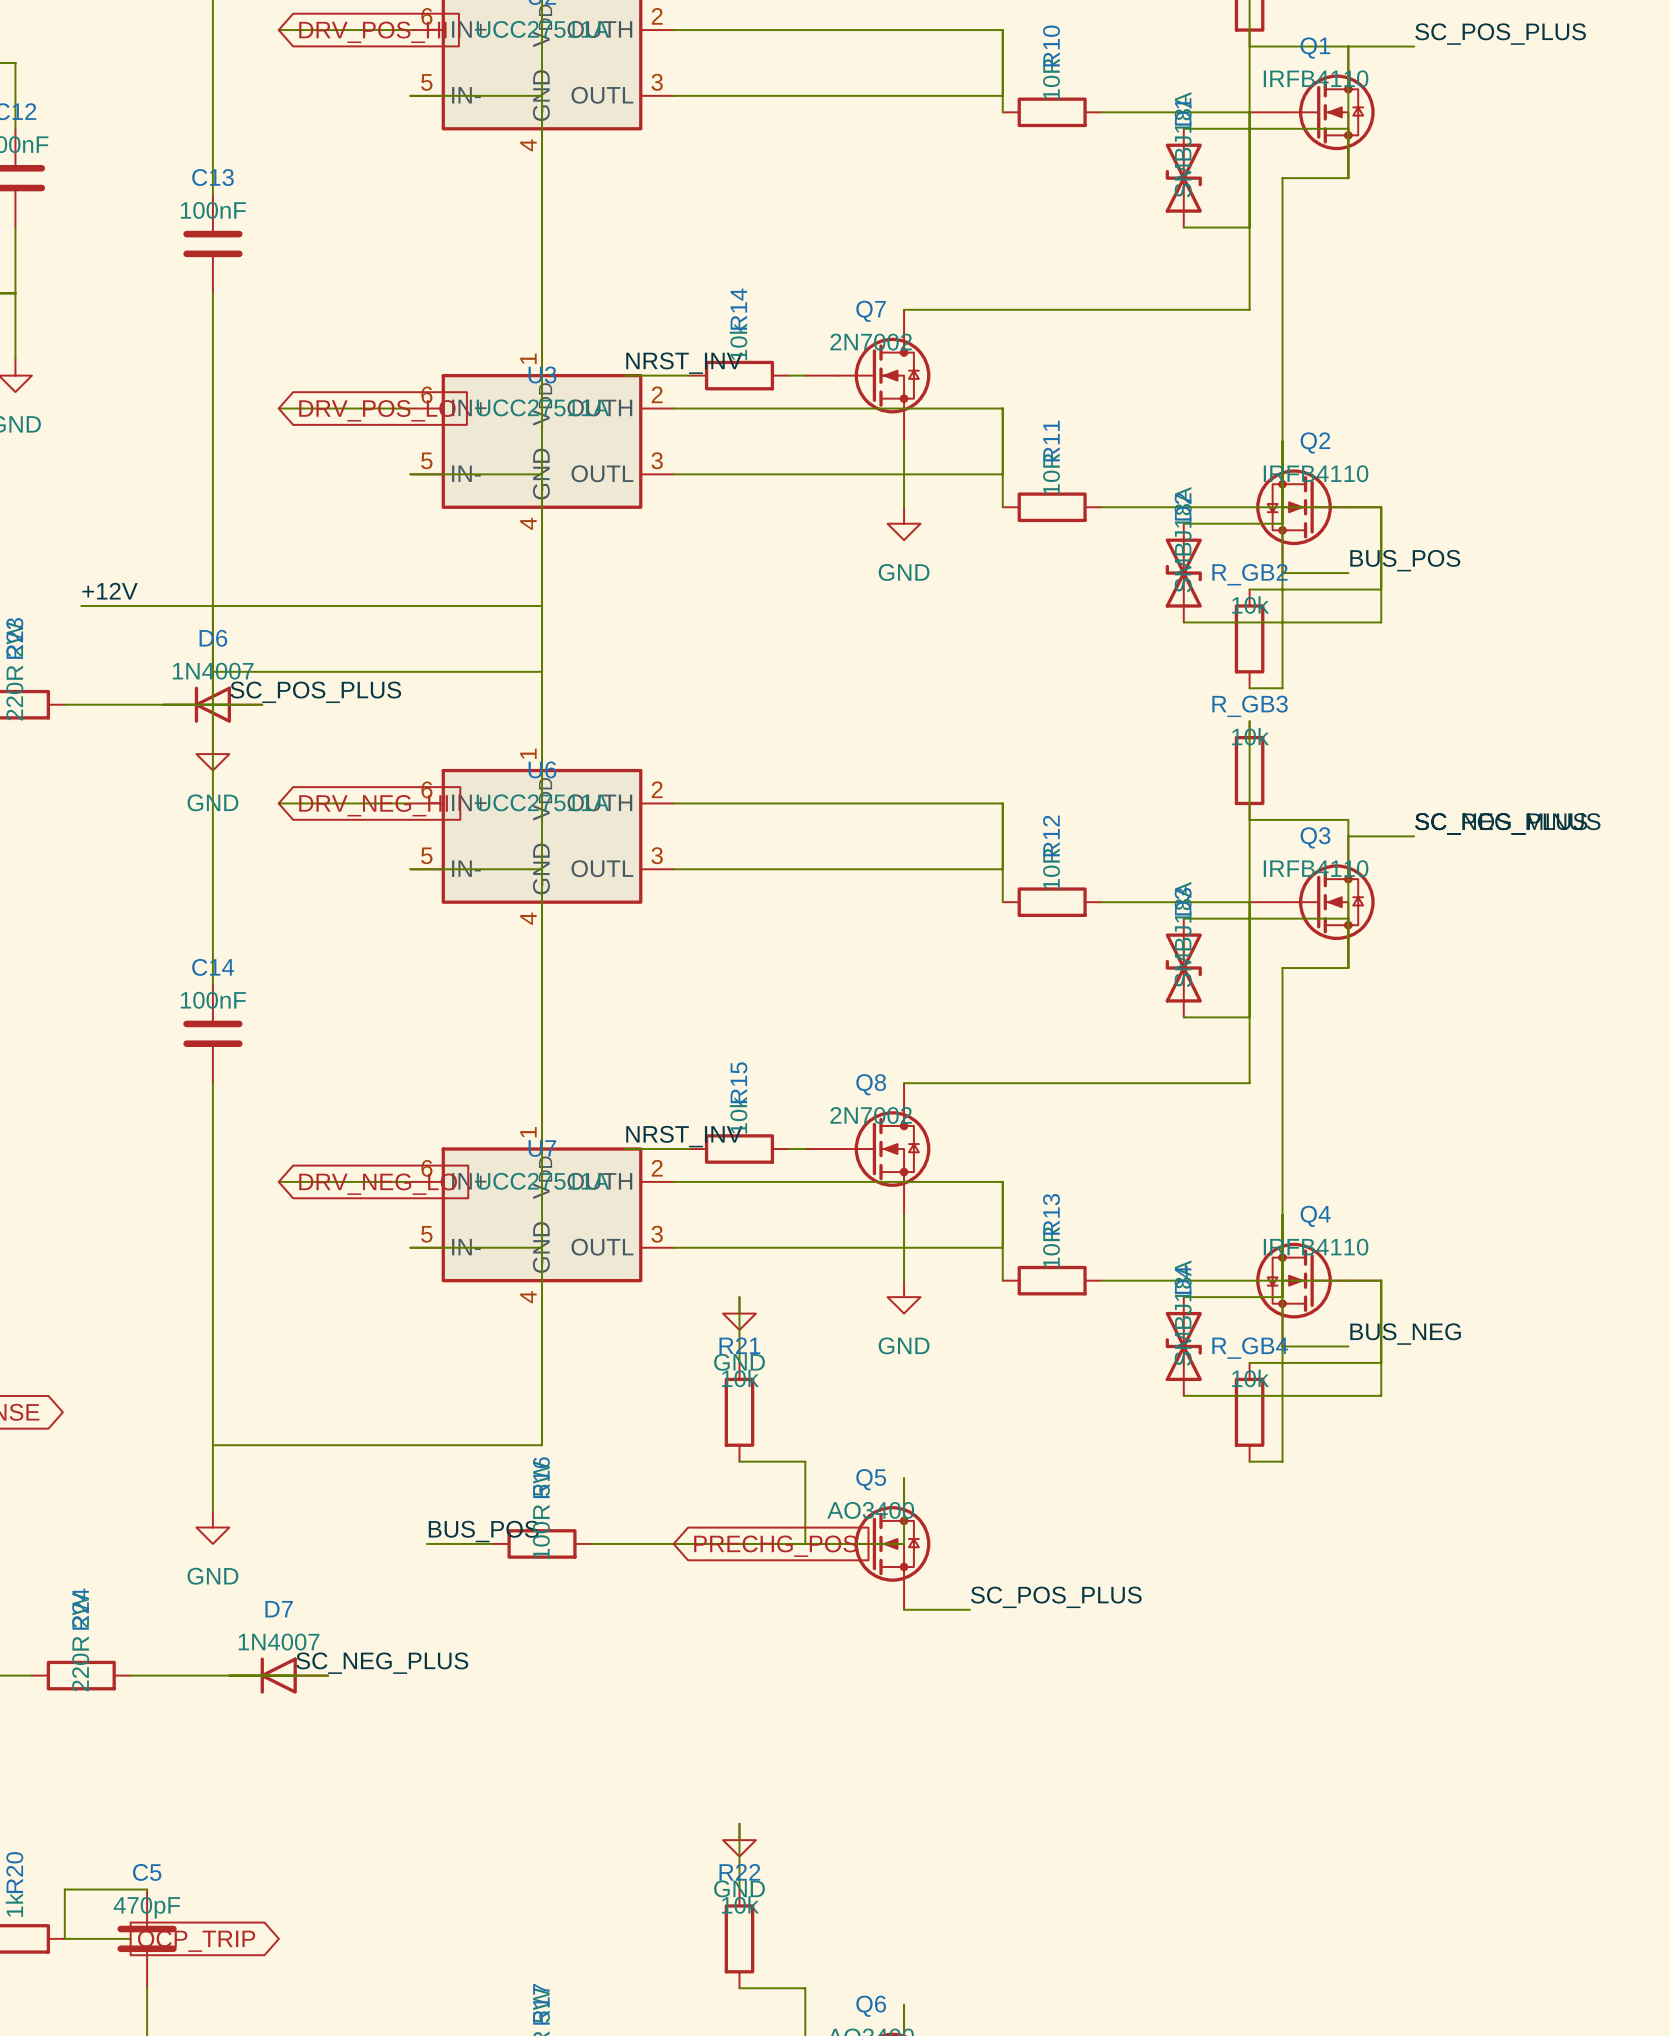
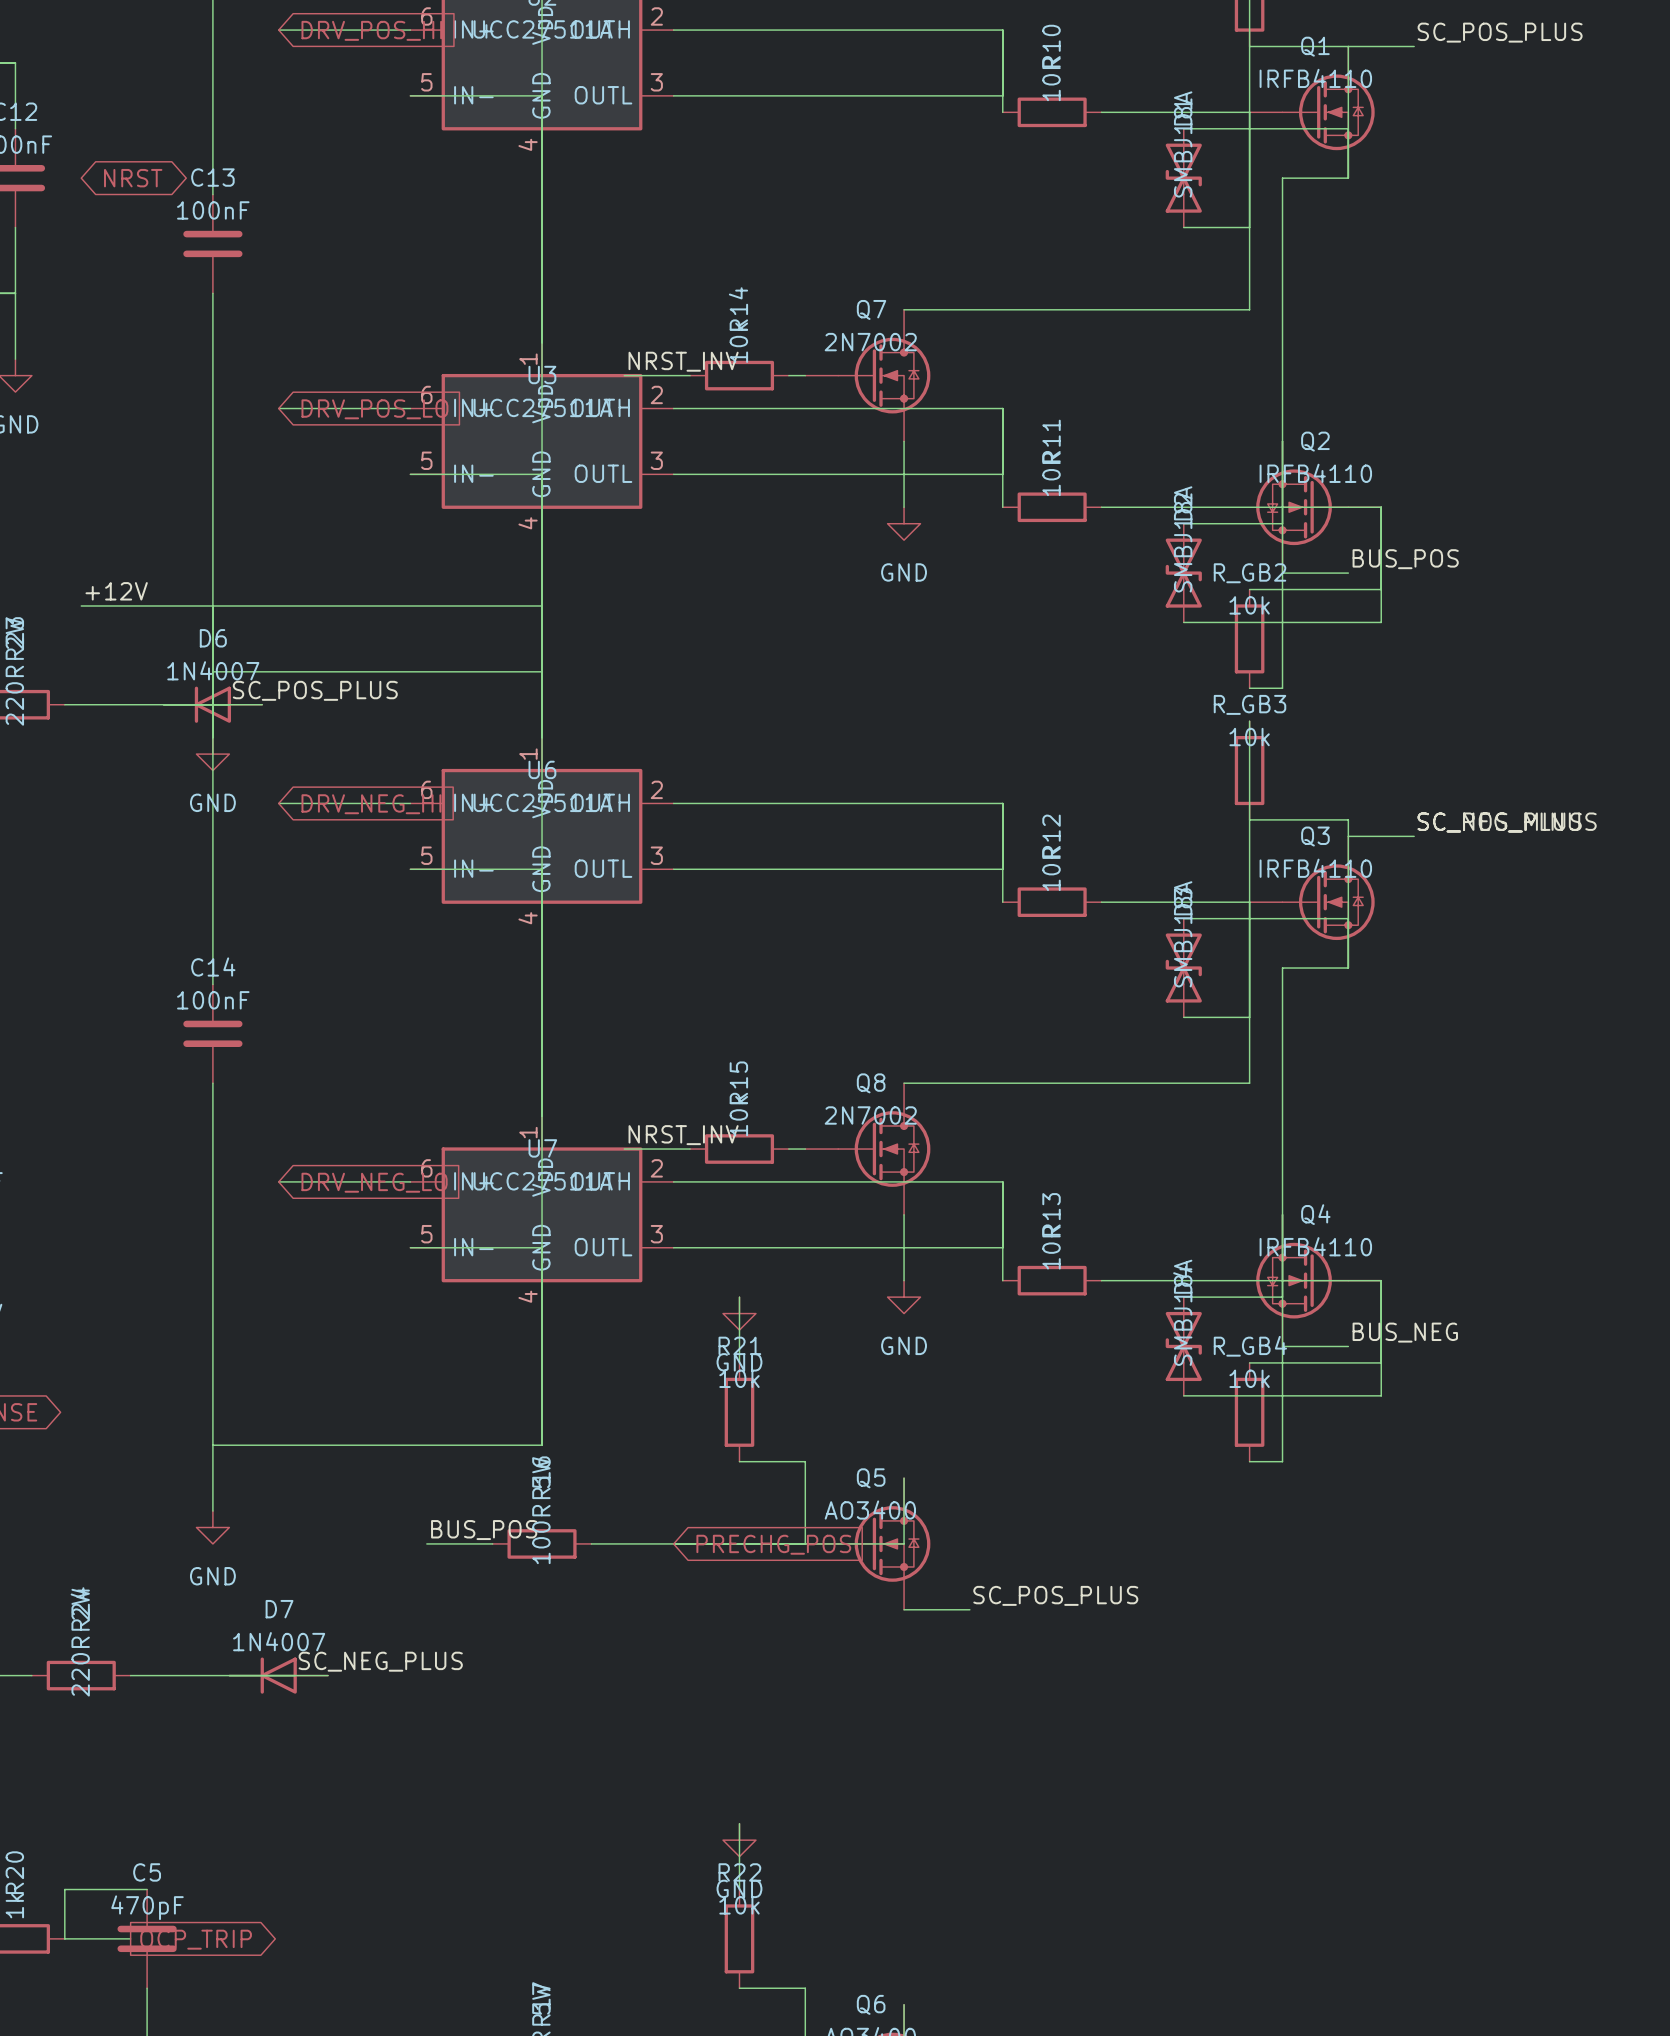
global label: none -> NRST (133, 178)

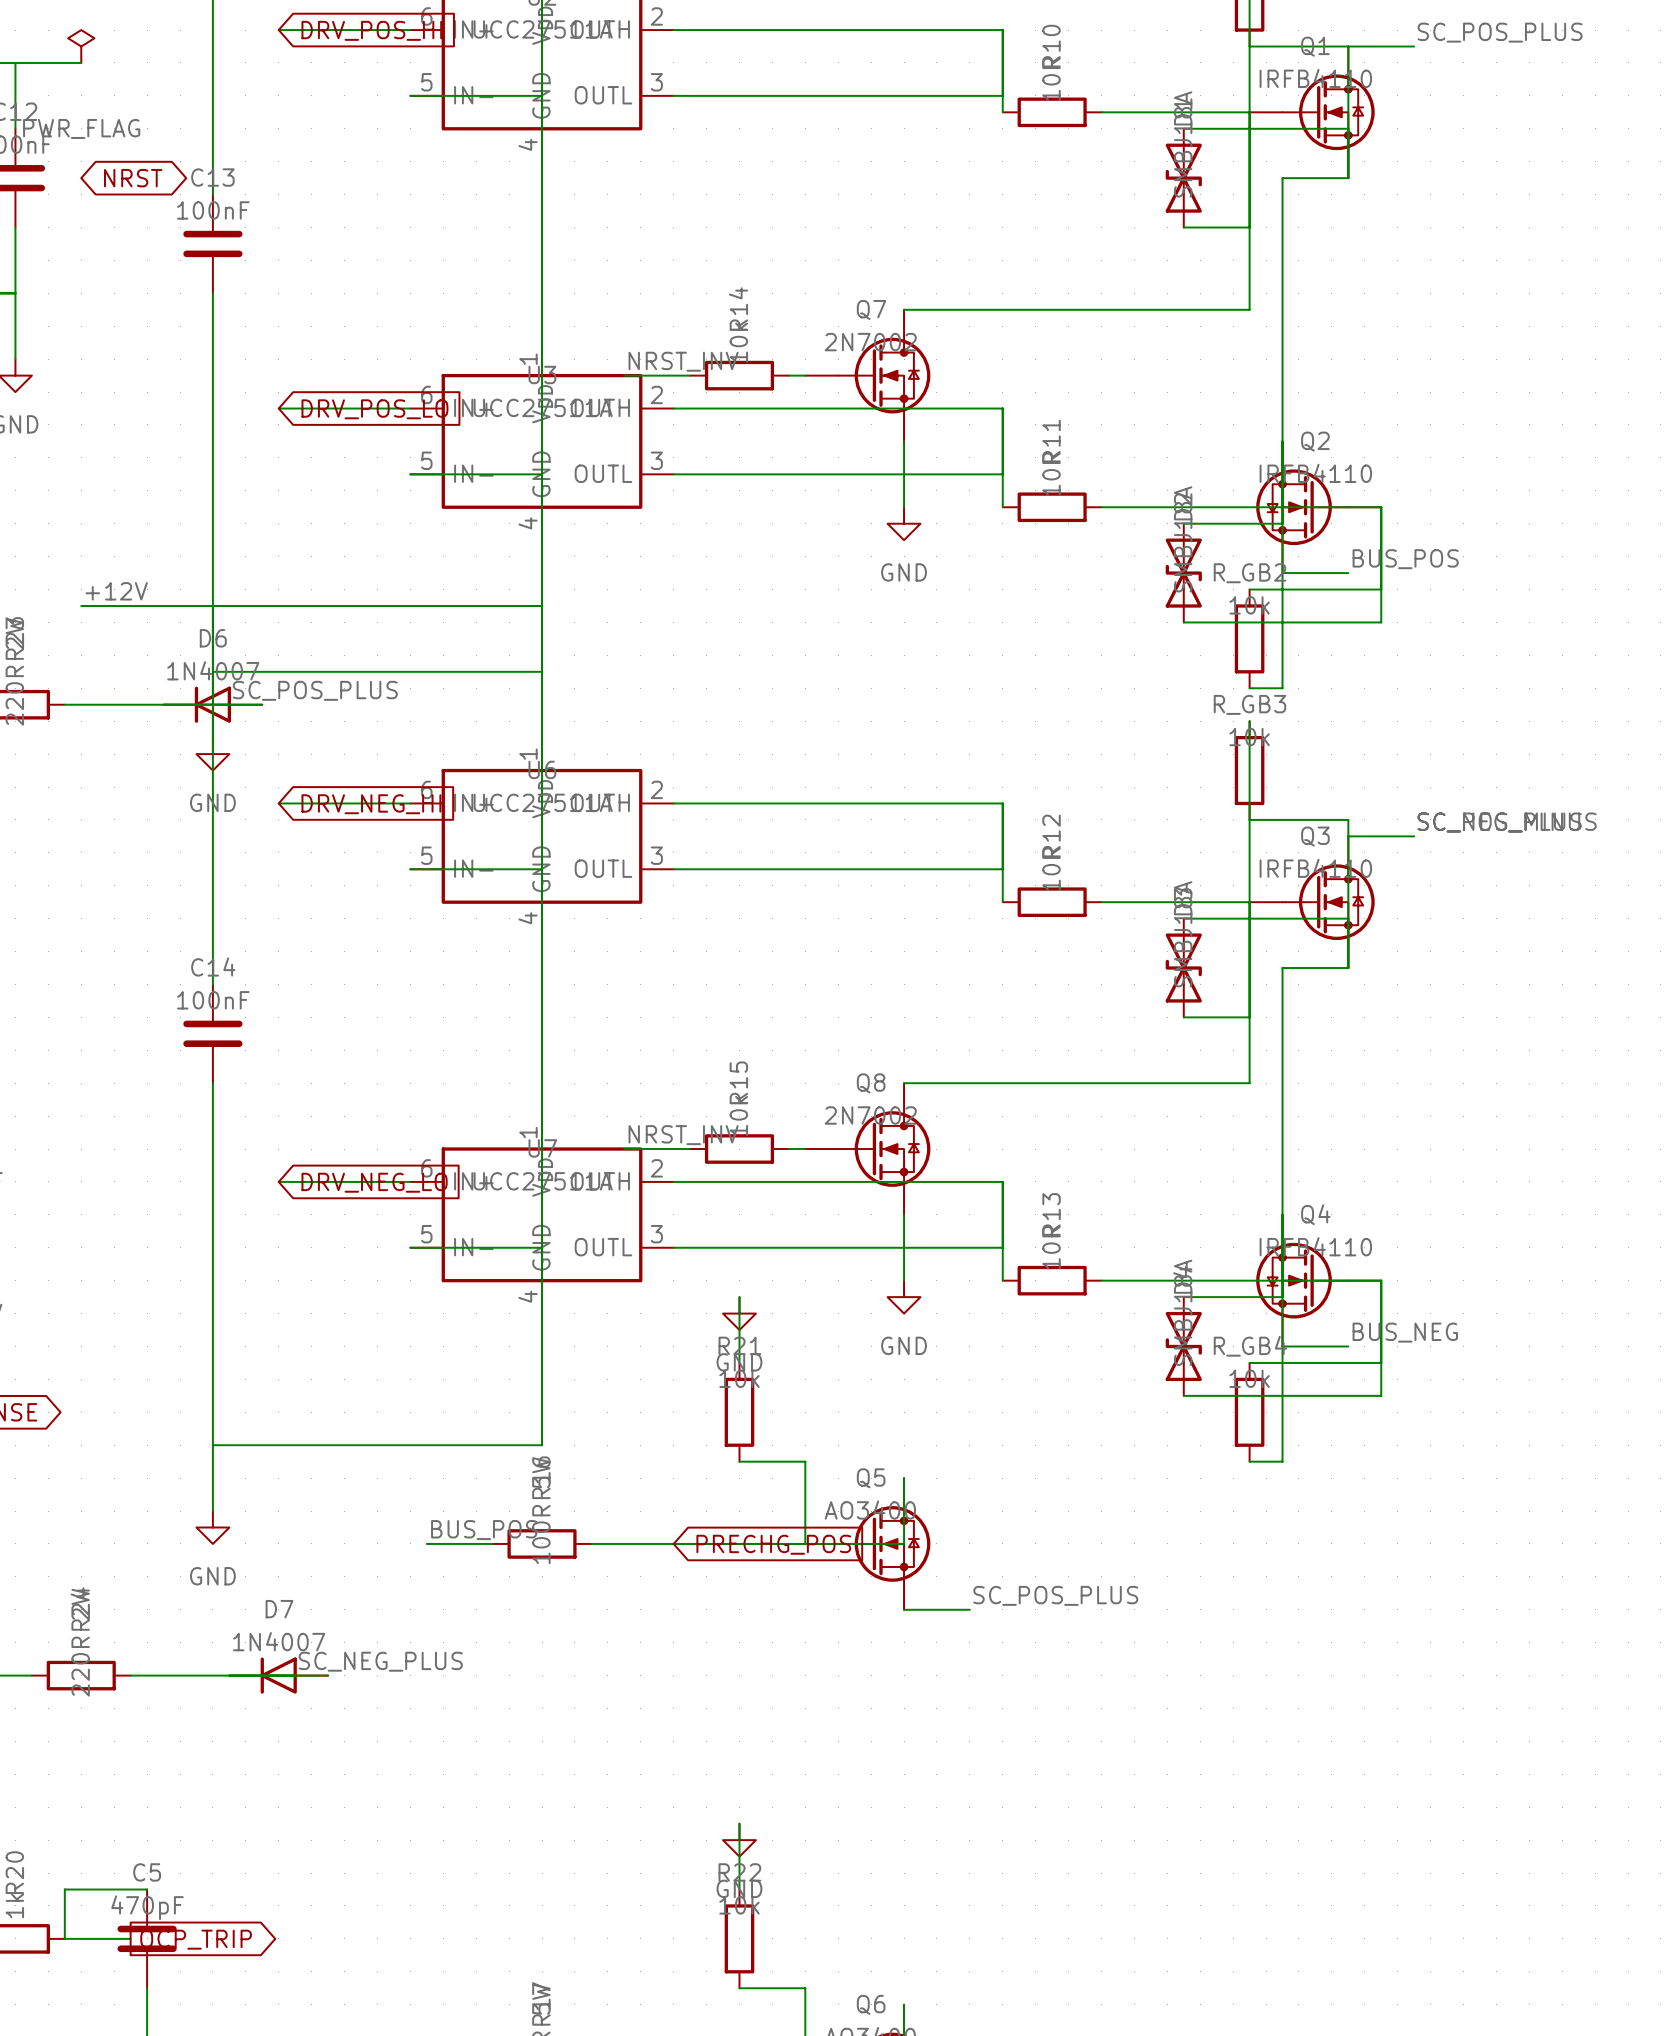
power symbol: none -> PWR_FLAG (81, 46)
wire: none -> (15, 62) (81, 62)

